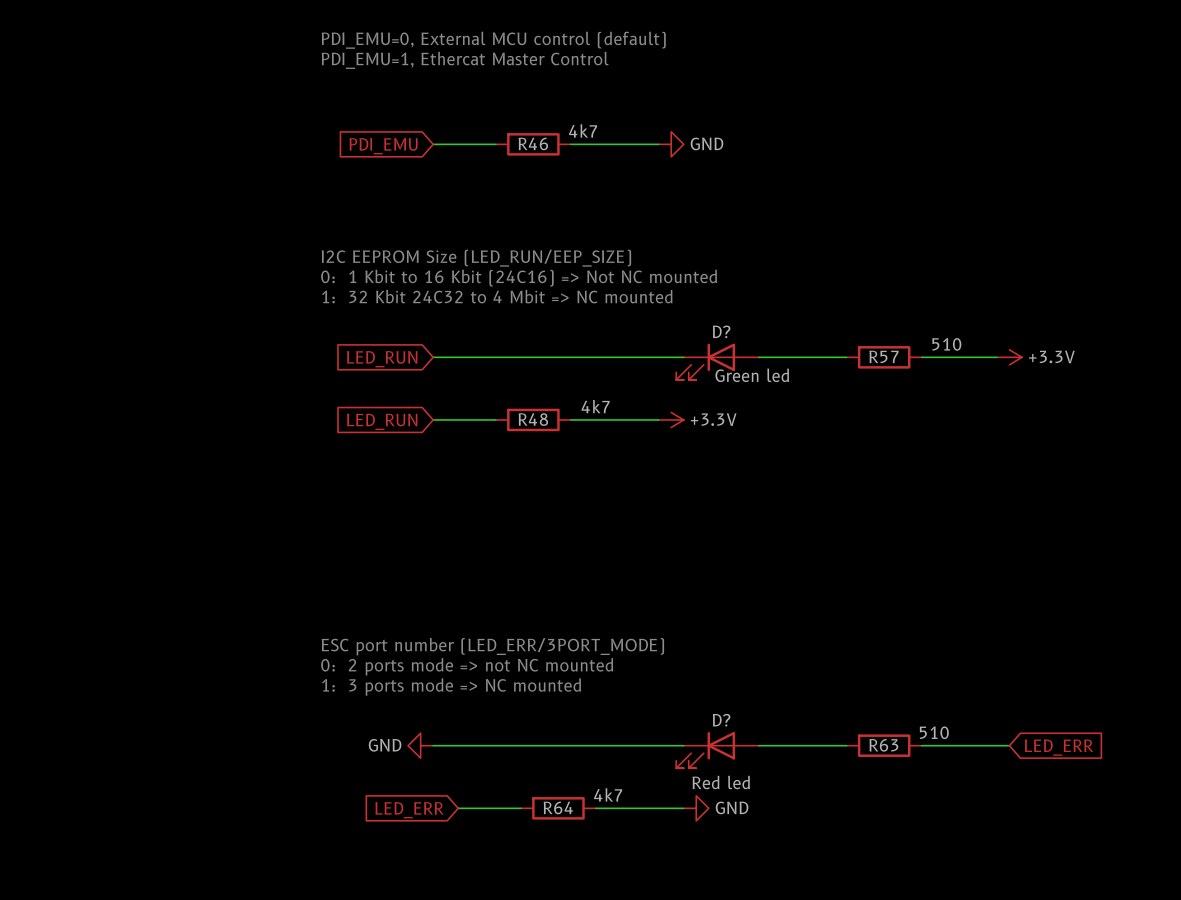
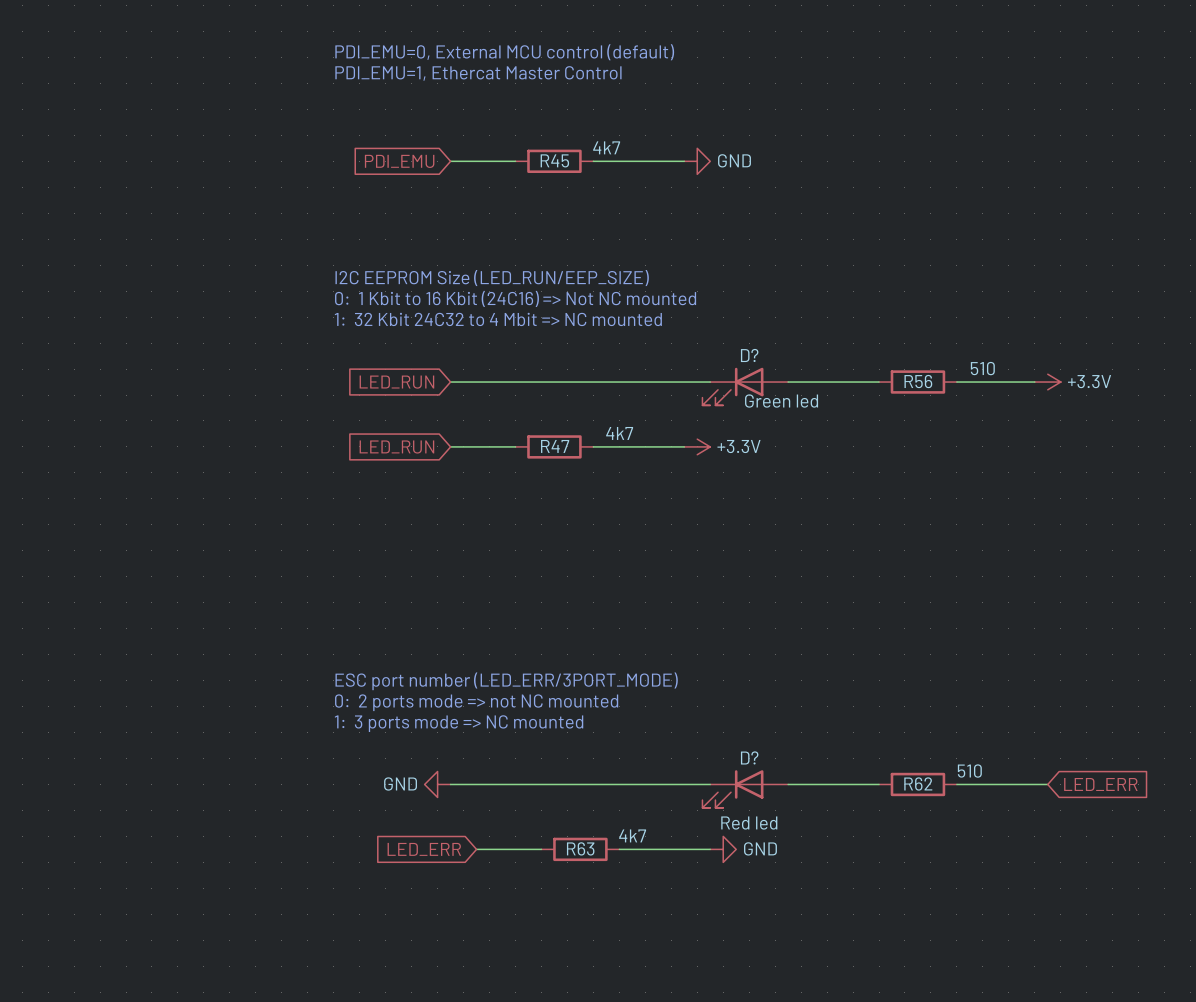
R46 name: R46 (533, 143) -> R45 (554, 160)
R57 name: R57 (883, 356) -> R56 (918, 381)
R48 name: R48 (533, 419) -> R47 (555, 446)
R63 name: R63 (883, 745) -> R62 (918, 783)
R64 name: R64 (558, 807) -> R63 (580, 848)

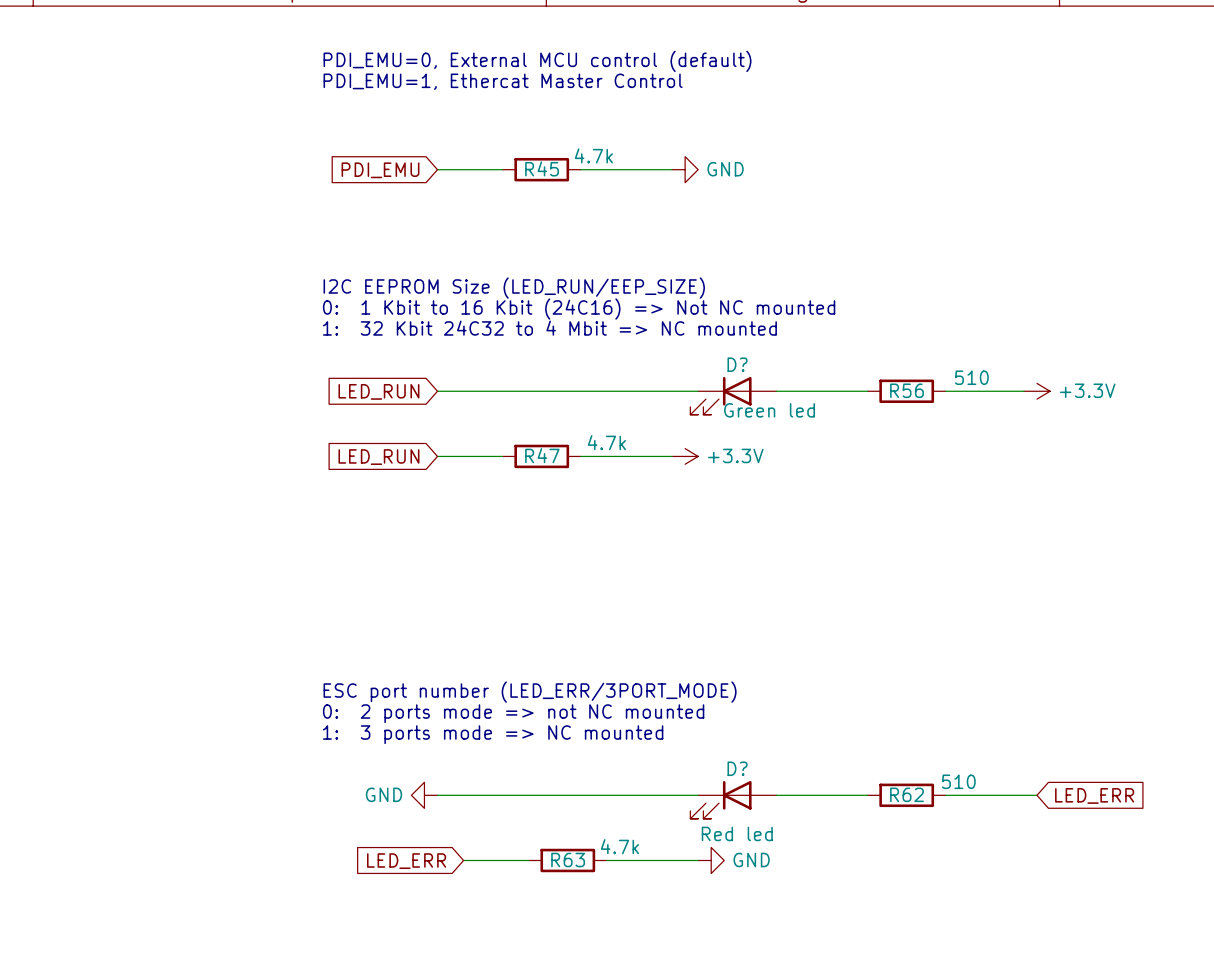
R45 value: 4k7 (606, 147) -> 4.7k (593, 155)
R47 value: 4k7 (619, 433) -> 4.7k (606, 442)
R63 value: 4k7 (632, 835) -> 4.7k (619, 846)

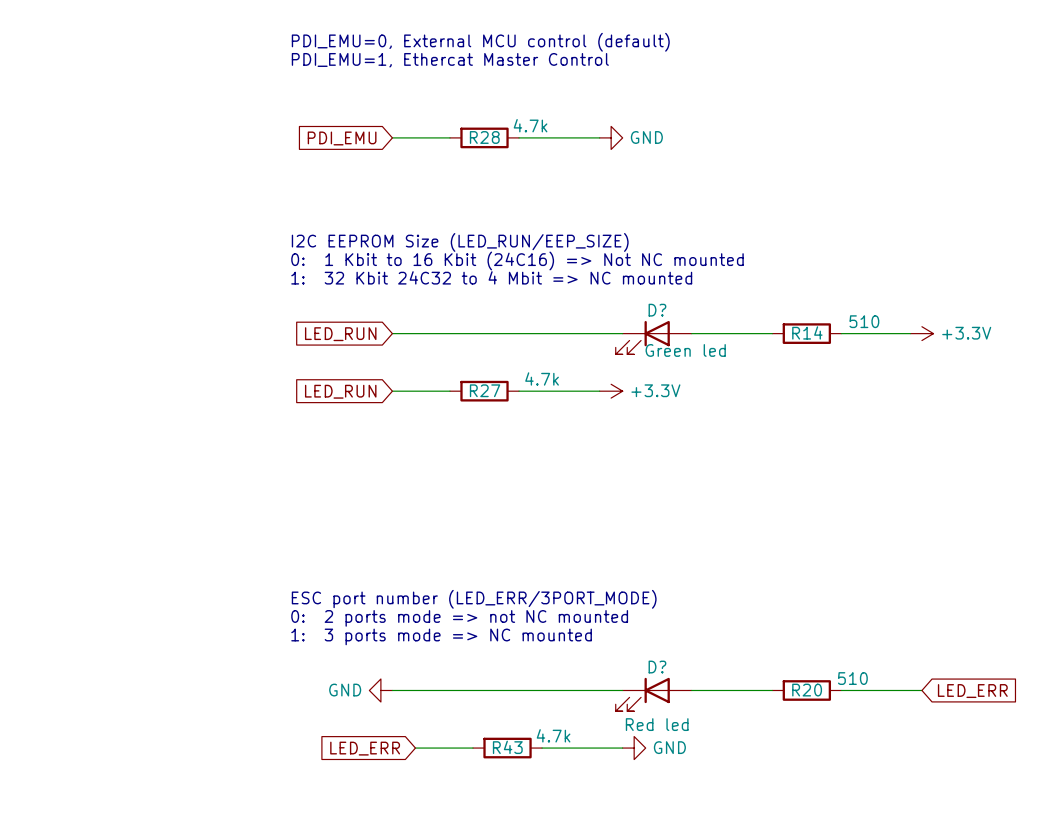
R45 name: R45 (542, 168) -> R28 (484, 137)
R56 name: R56 (907, 390) -> R14 (807, 332)
R47 name: R47 (542, 455) -> R27 (485, 390)
R62 name: R62 (907, 794) -> R20 (807, 690)
R63 name: R63 (568, 860) -> R43 (507, 747)

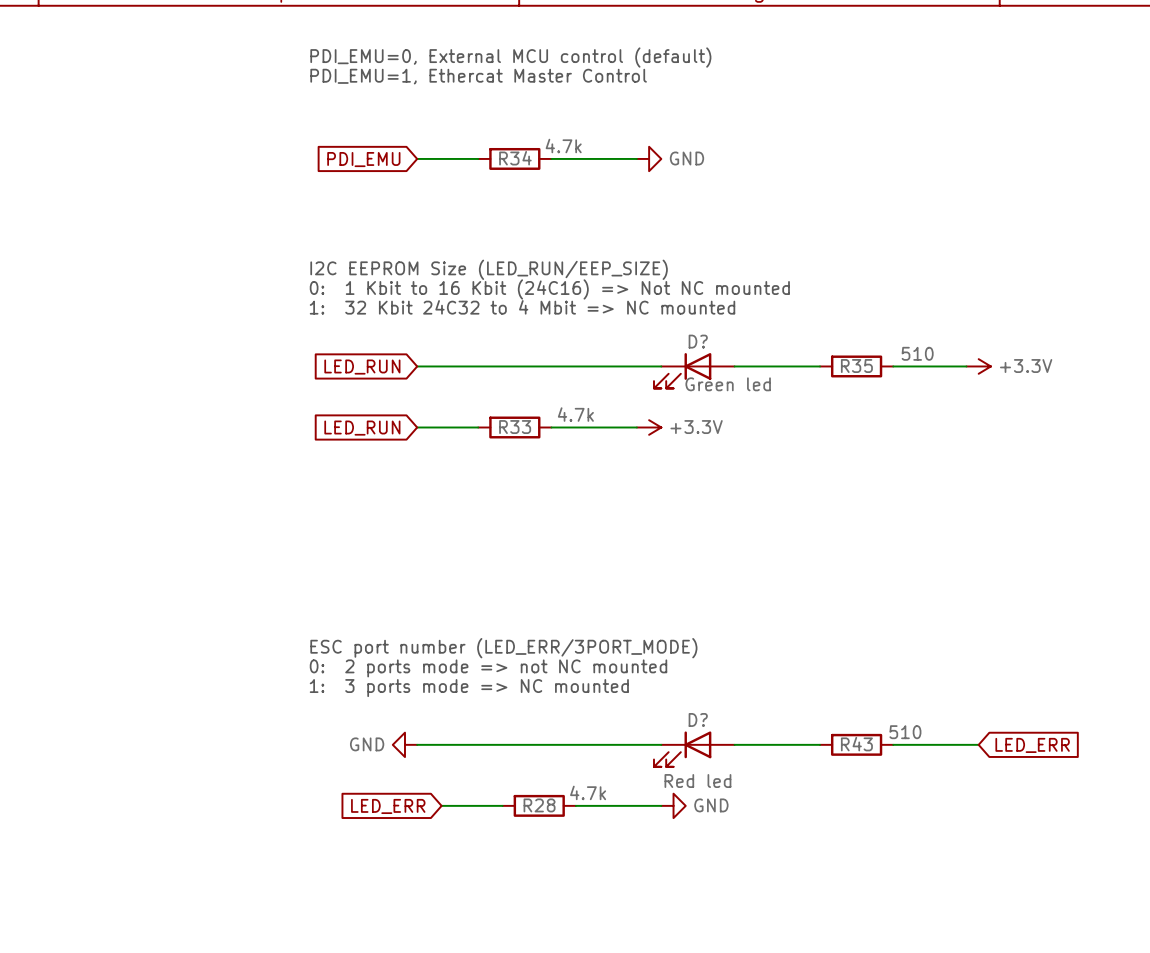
R28 name: R28 (484, 137) -> R34 (515, 158)
R14 name: R14 (807, 332) -> R35 (856, 366)
R27 name: R27 (485, 390) -> R33 (515, 427)
R20 name: R20 (807, 690) -> R43 (856, 744)
R43 name: R43 (507, 747) -> R28 (539, 805)

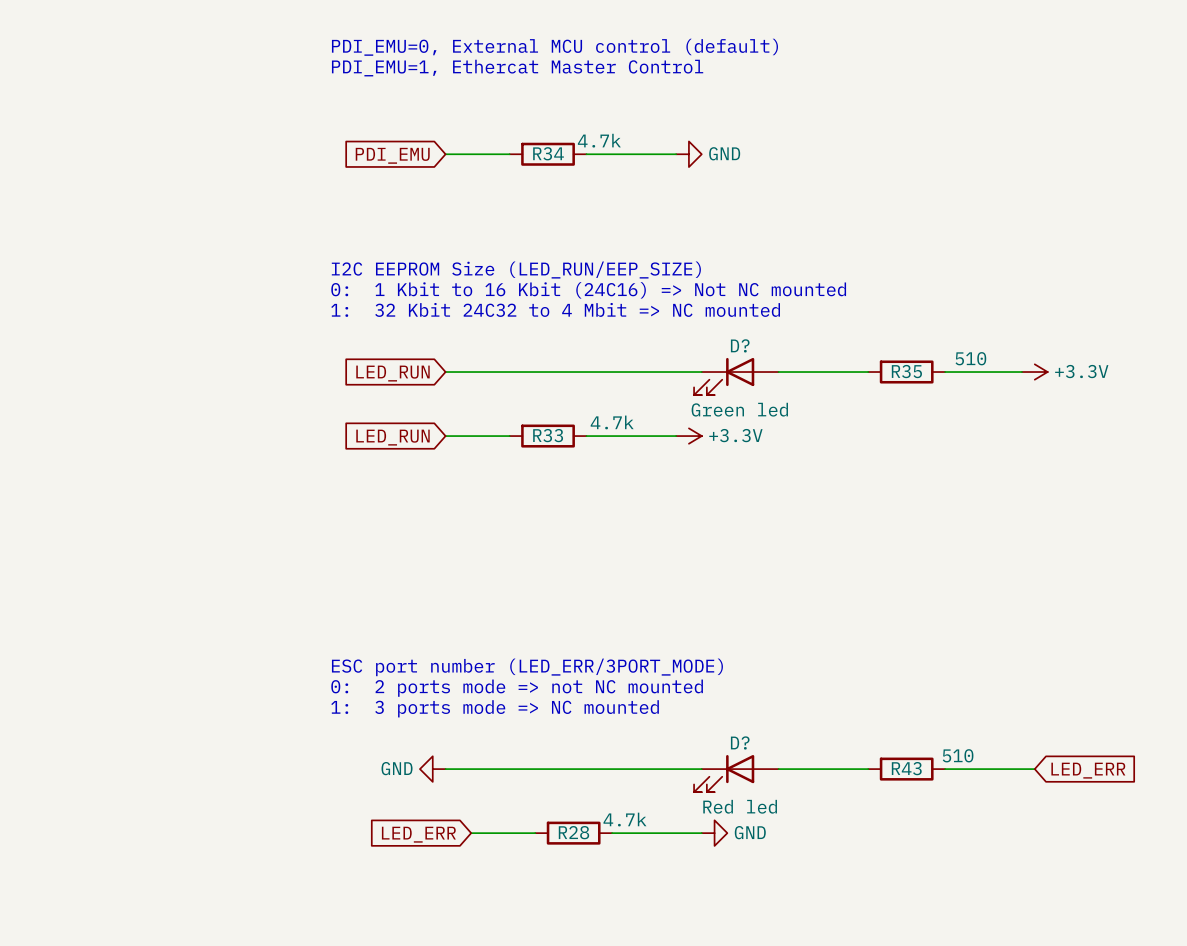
D? value position: Green led (728, 384) -> Green led (739, 409)

